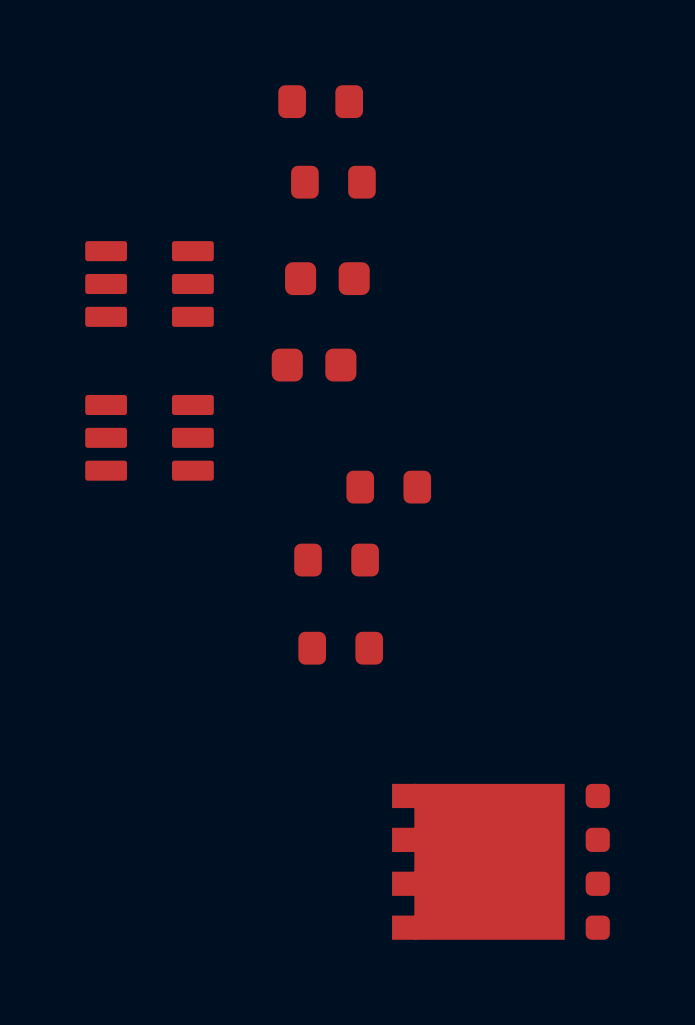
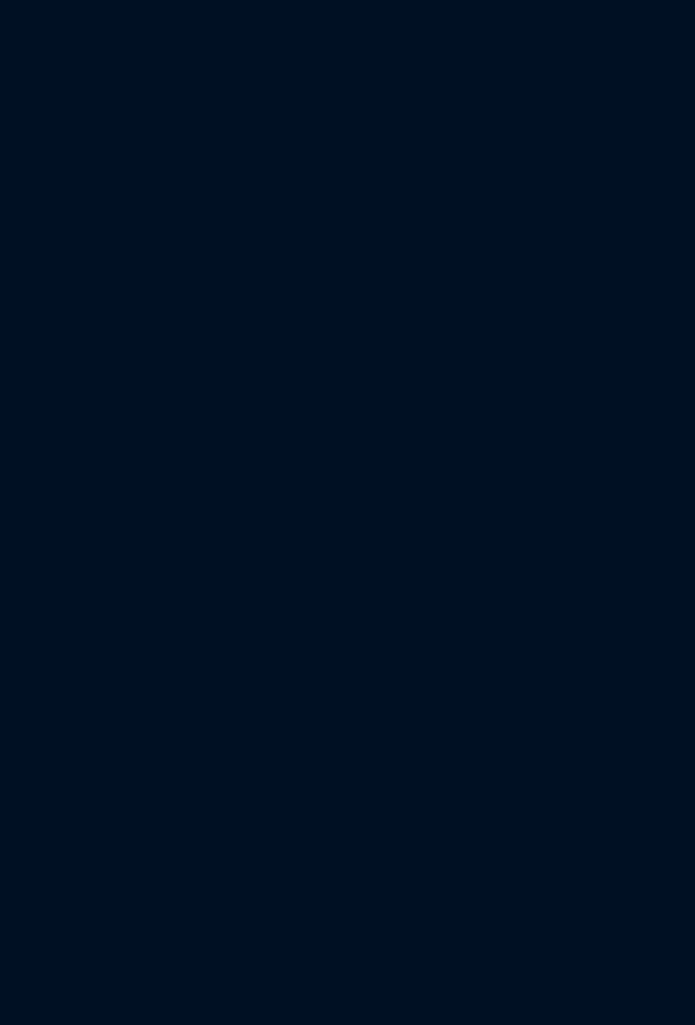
part: (320, 101) -> none
part: (333, 182) -> none
part: (327, 278) -> none
part: (149, 284) -> none
part: (314, 365) -> none
part: (149, 437) -> none
part: (388, 487) -> none
part: (336, 560) -> none
part: (340, 648) -> none
part: (500, 861) -> none

